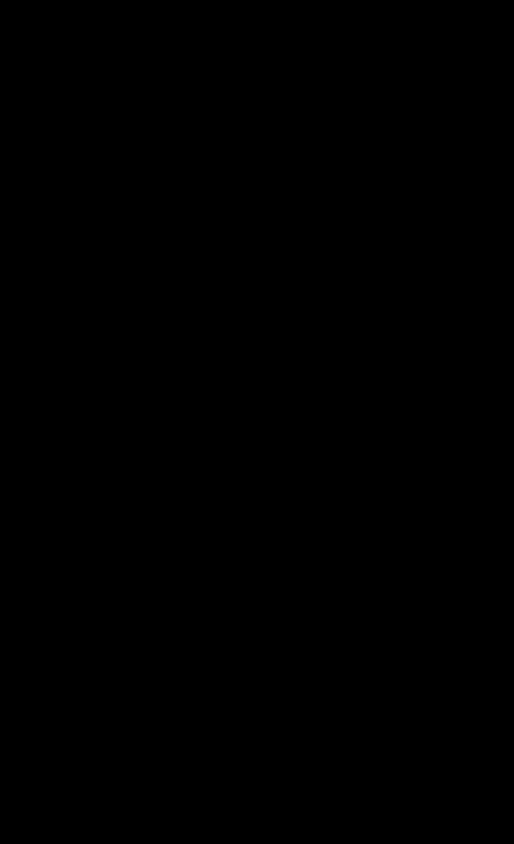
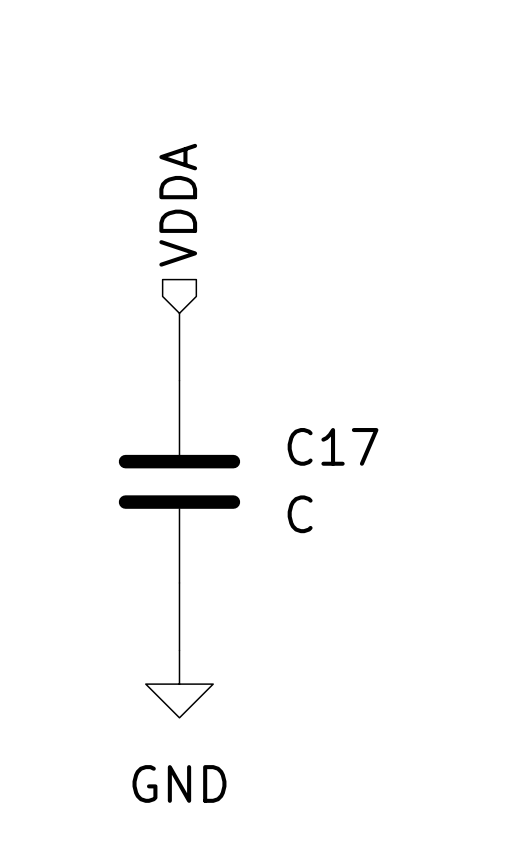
hierarchical label: none -> VDDA (178, 205)
wire: none -> (179, 313) (179, 380)
C17: none -> C (179, 481)
wire: none -> (179, 582) (179, 650)
power symbol: none -> GND (179, 684)

